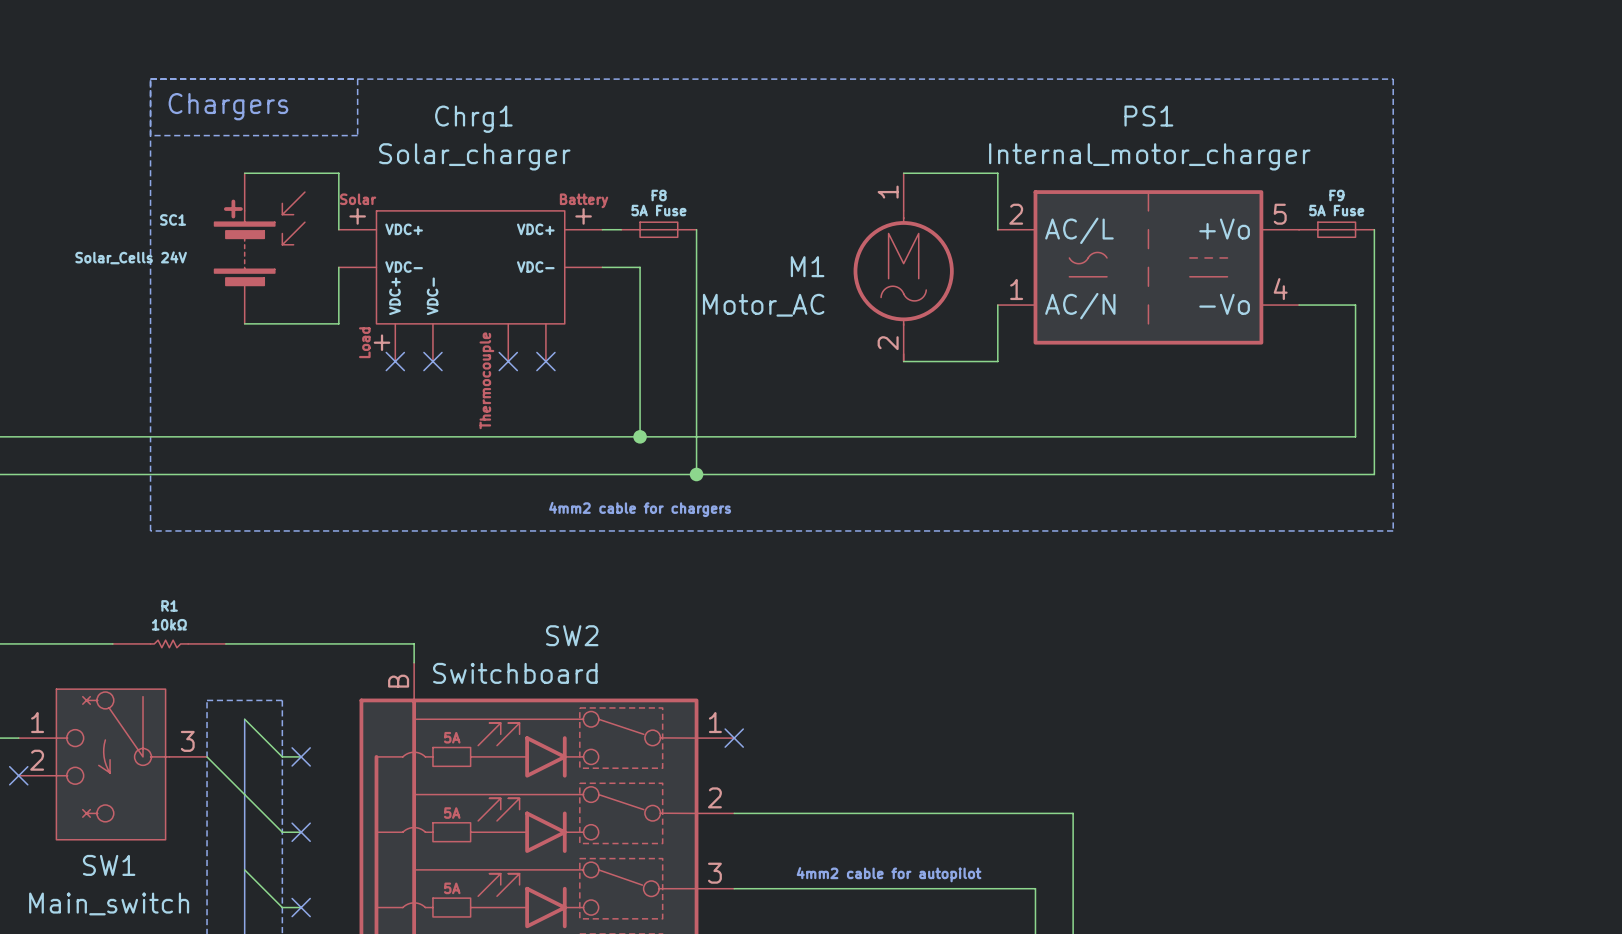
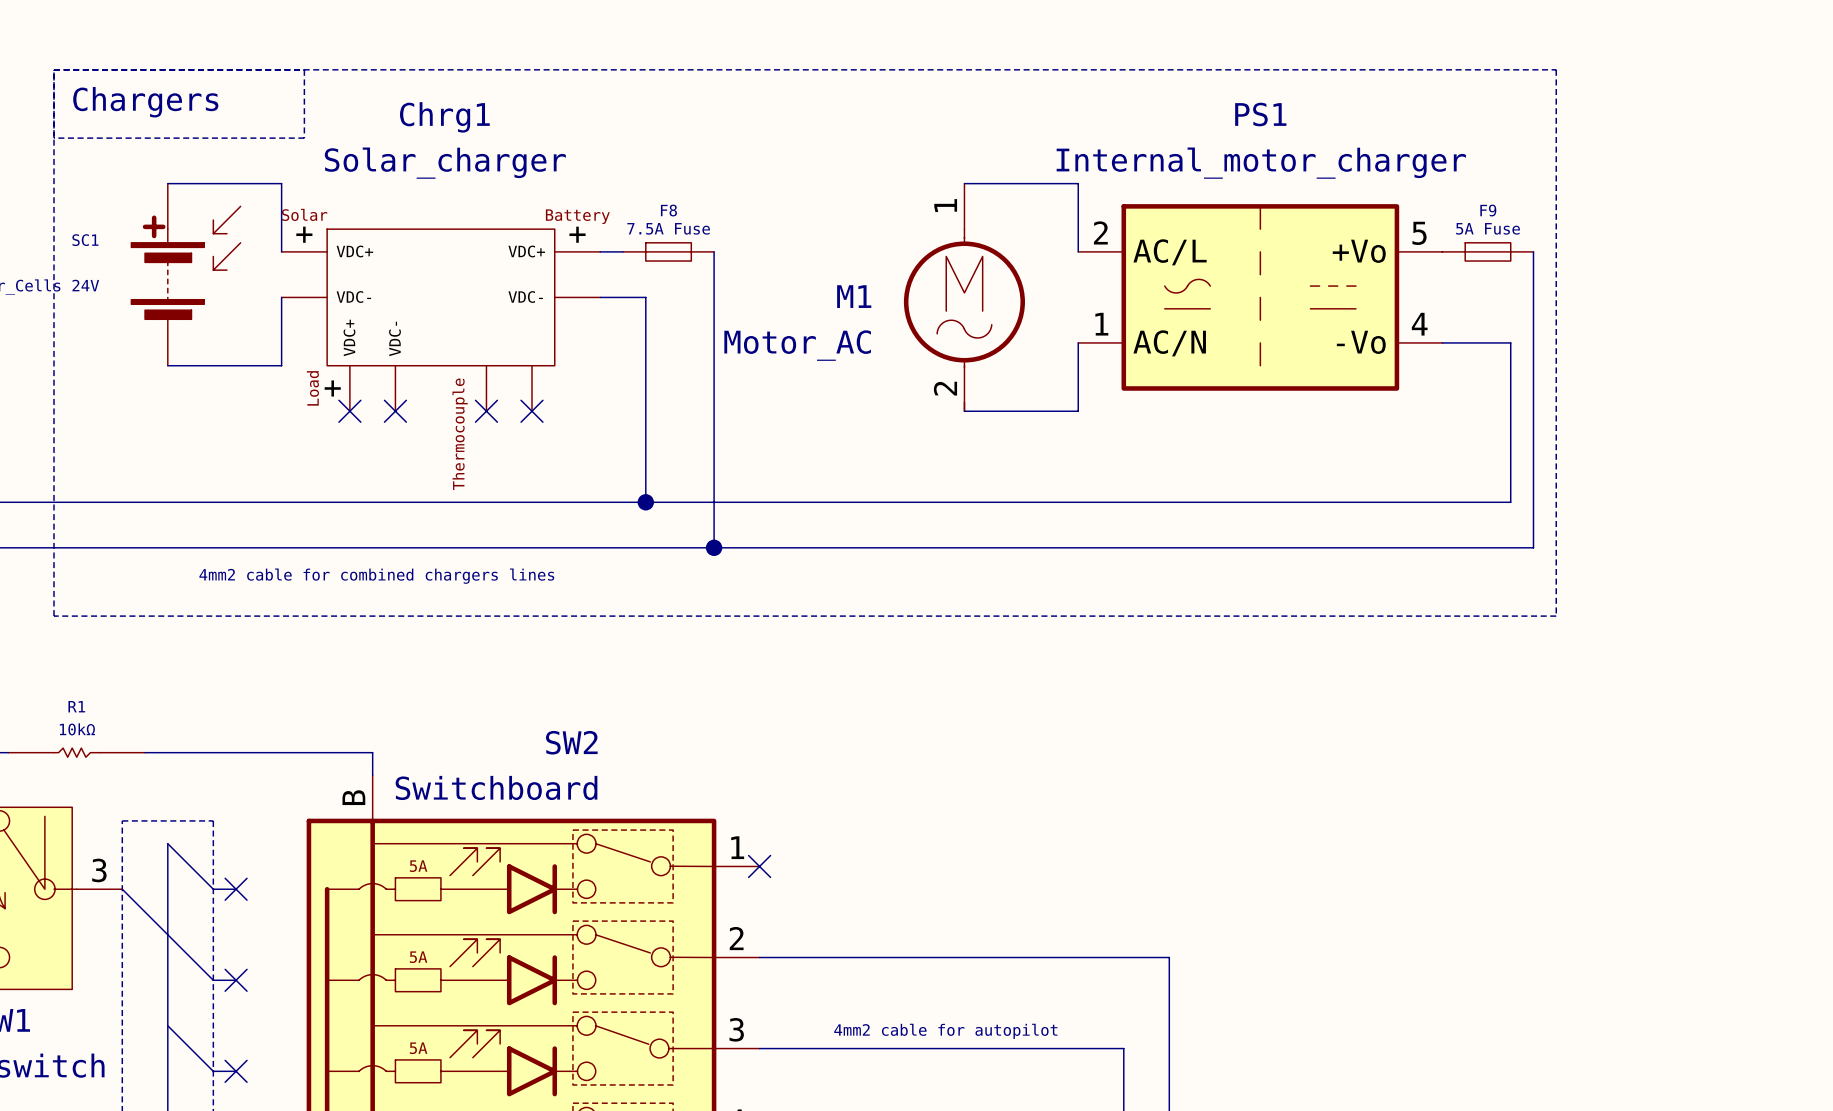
F8 value: 5A Fuse (658, 210) -> 7.5A Fuse (668, 228)
text: 4mm2 cable for chargers (640, 509) -> 4mm2 cable for combined chargers lines (376, 576)

